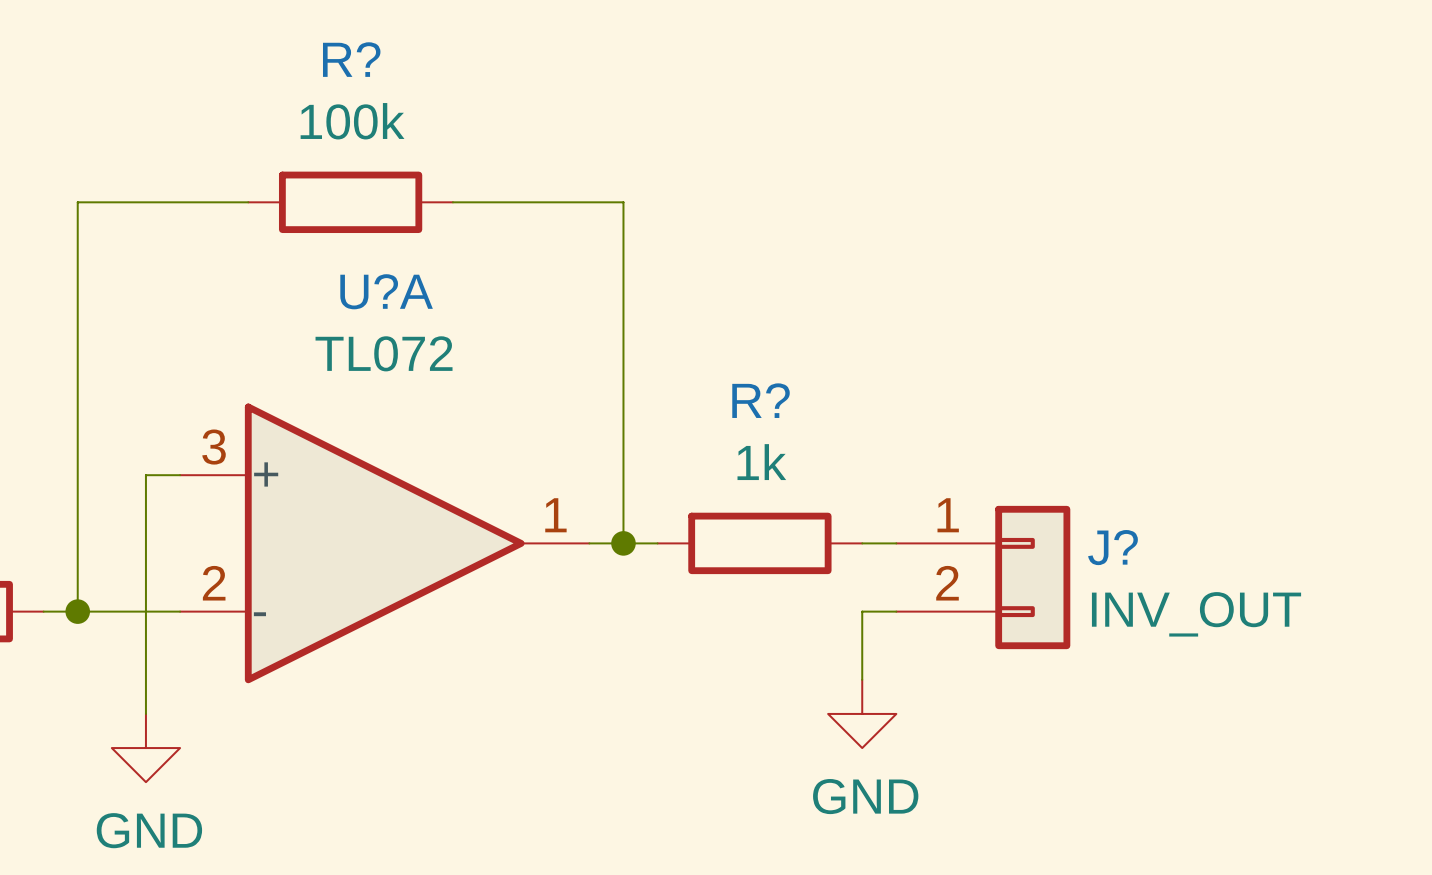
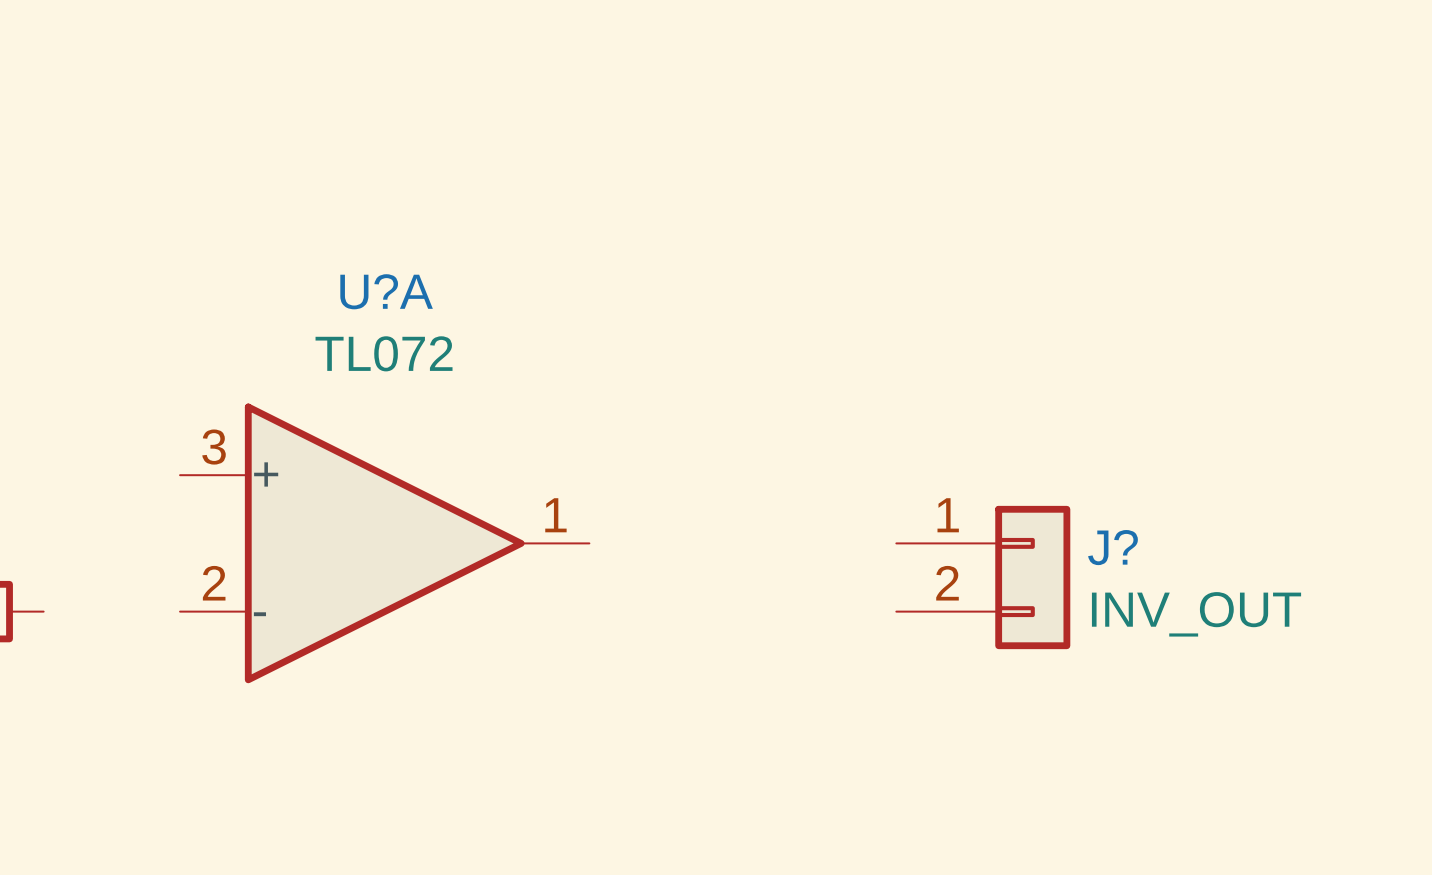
wire: (248, 202) (77, 202) (77, 611) -> none
R?: 100k (350, 202) -> none
wire: (452, 202) (623, 202) (623, 543) -> none
wire: (180, 475) (145, 475) (145, 713) -> none
wire: (589, 543) (657, 543) -> none
junction: (623, 543) -> none
R?: 1k (759, 543) -> none
wire: (862, 543) (896, 543) -> none
wire: (43, 611) (180, 611) -> none
junction: (77, 611) -> none
wire: (896, 611) (862, 611) (862, 679) -> none
power symbol: GND (862, 713) -> none
power symbol: GND (145, 748) -> none

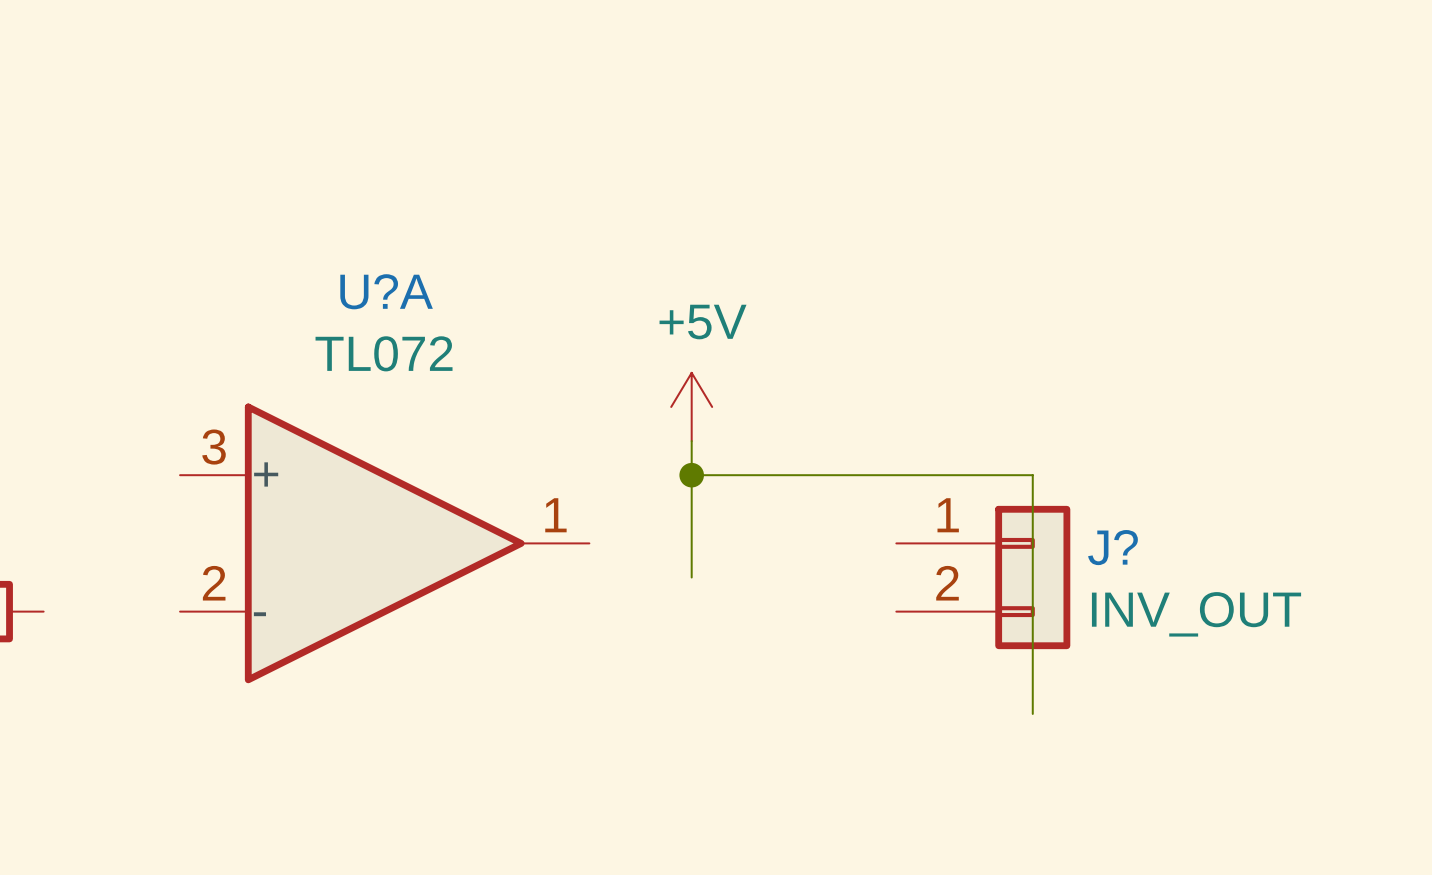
power symbol: none -> +5V (691, 406)
wire: none -> (691, 441) (691, 577)
wire: none -> (691, 475) (1032, 475) (1032, 713)
junction: none -> (691, 475)

